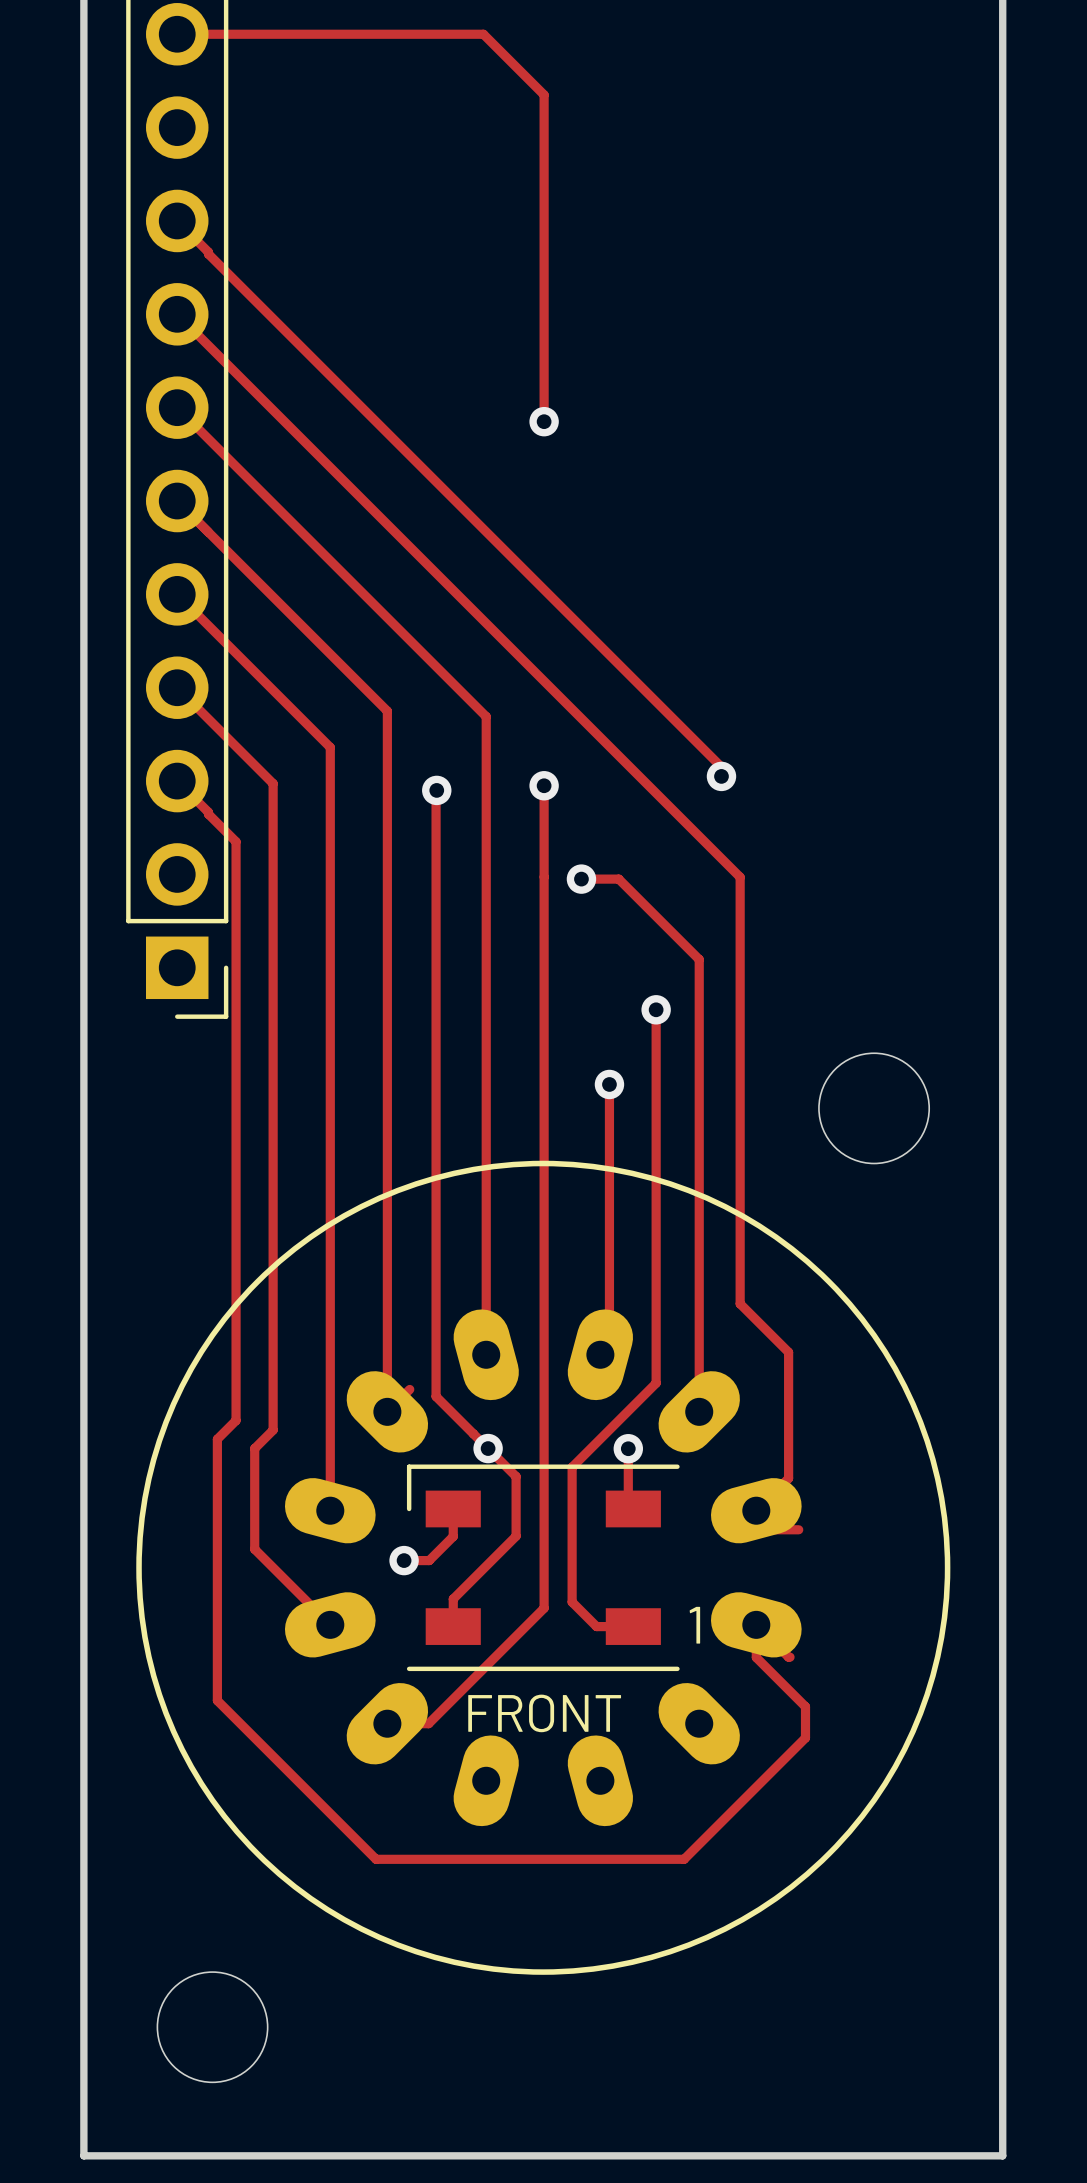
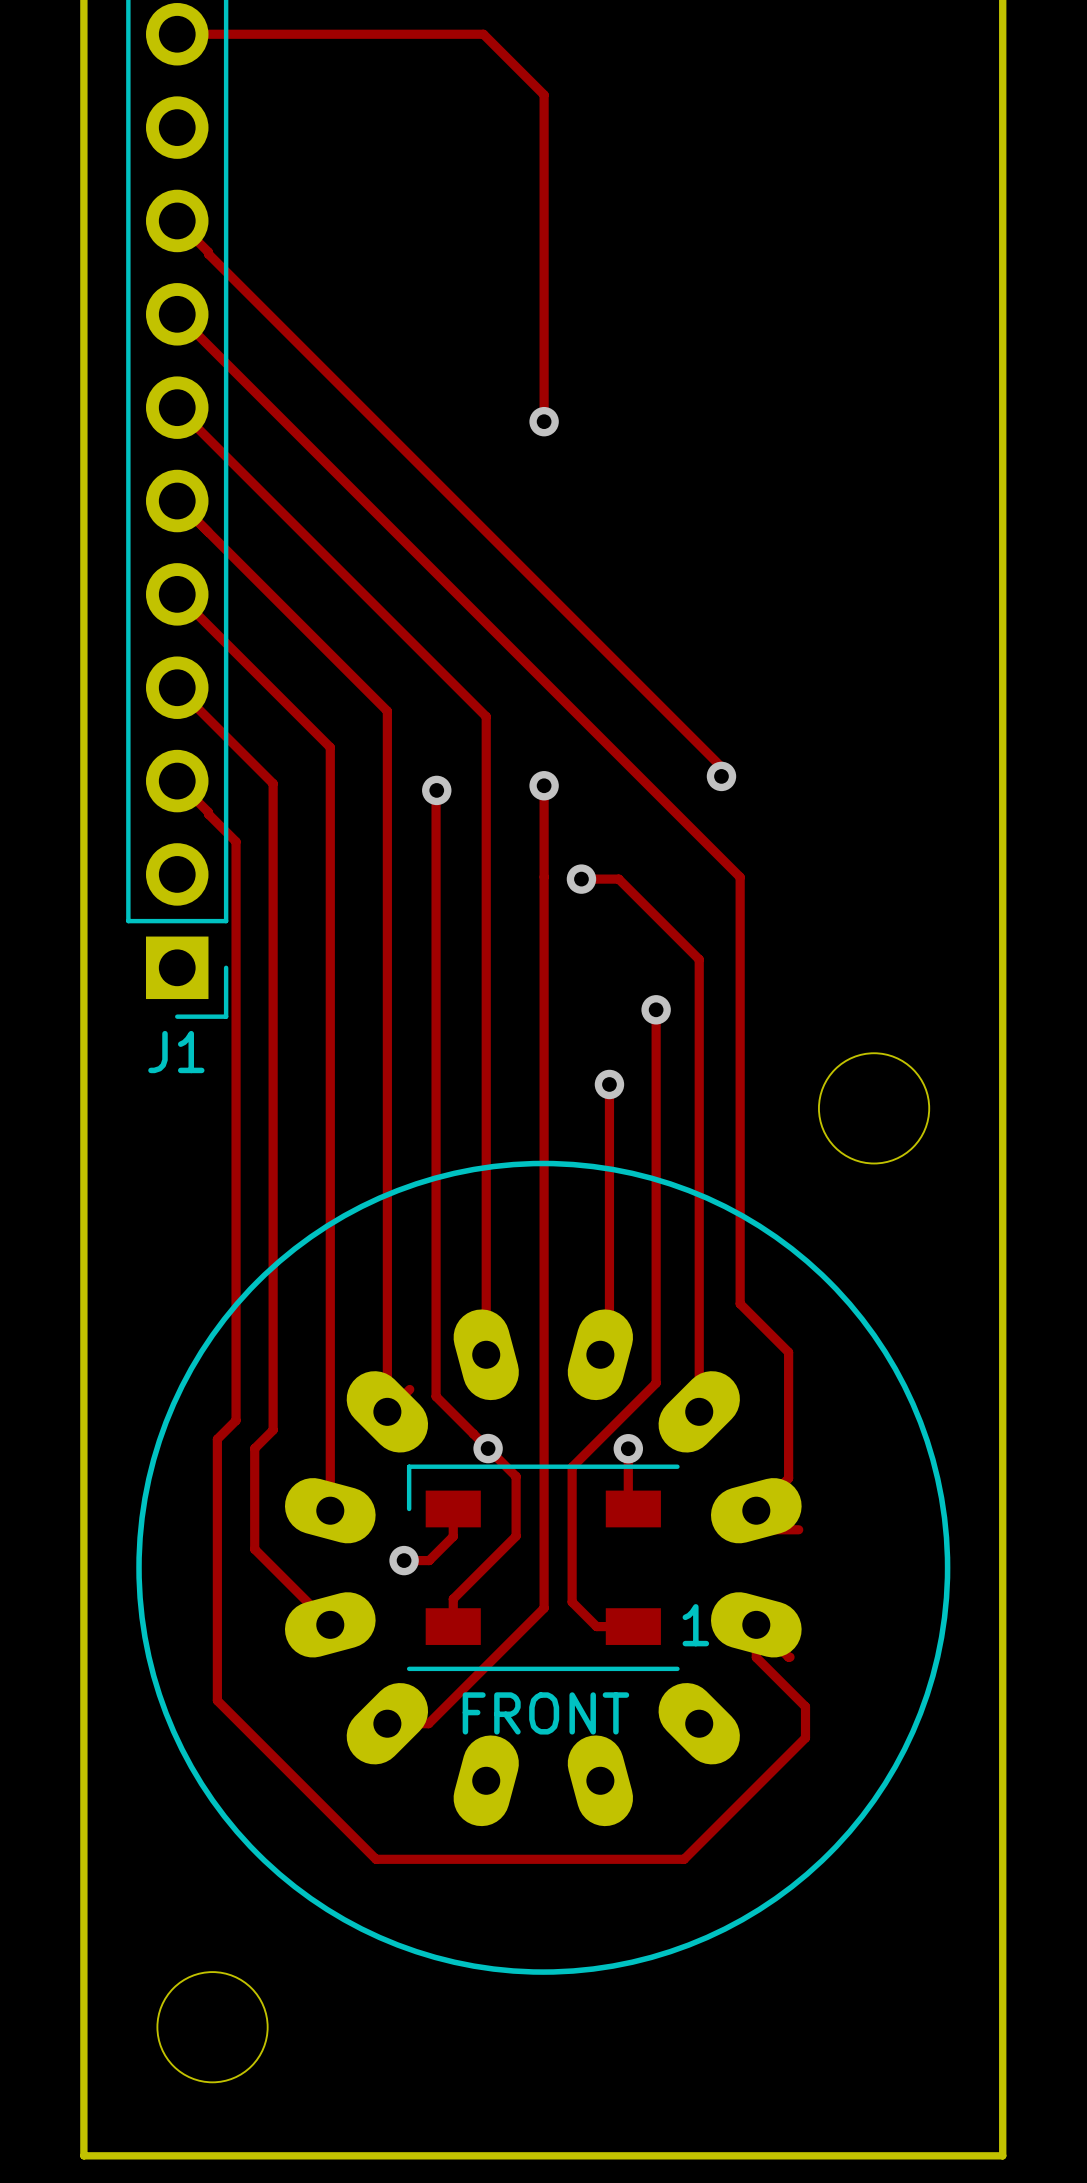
J1 name: none -> J1 (176, 1052)

